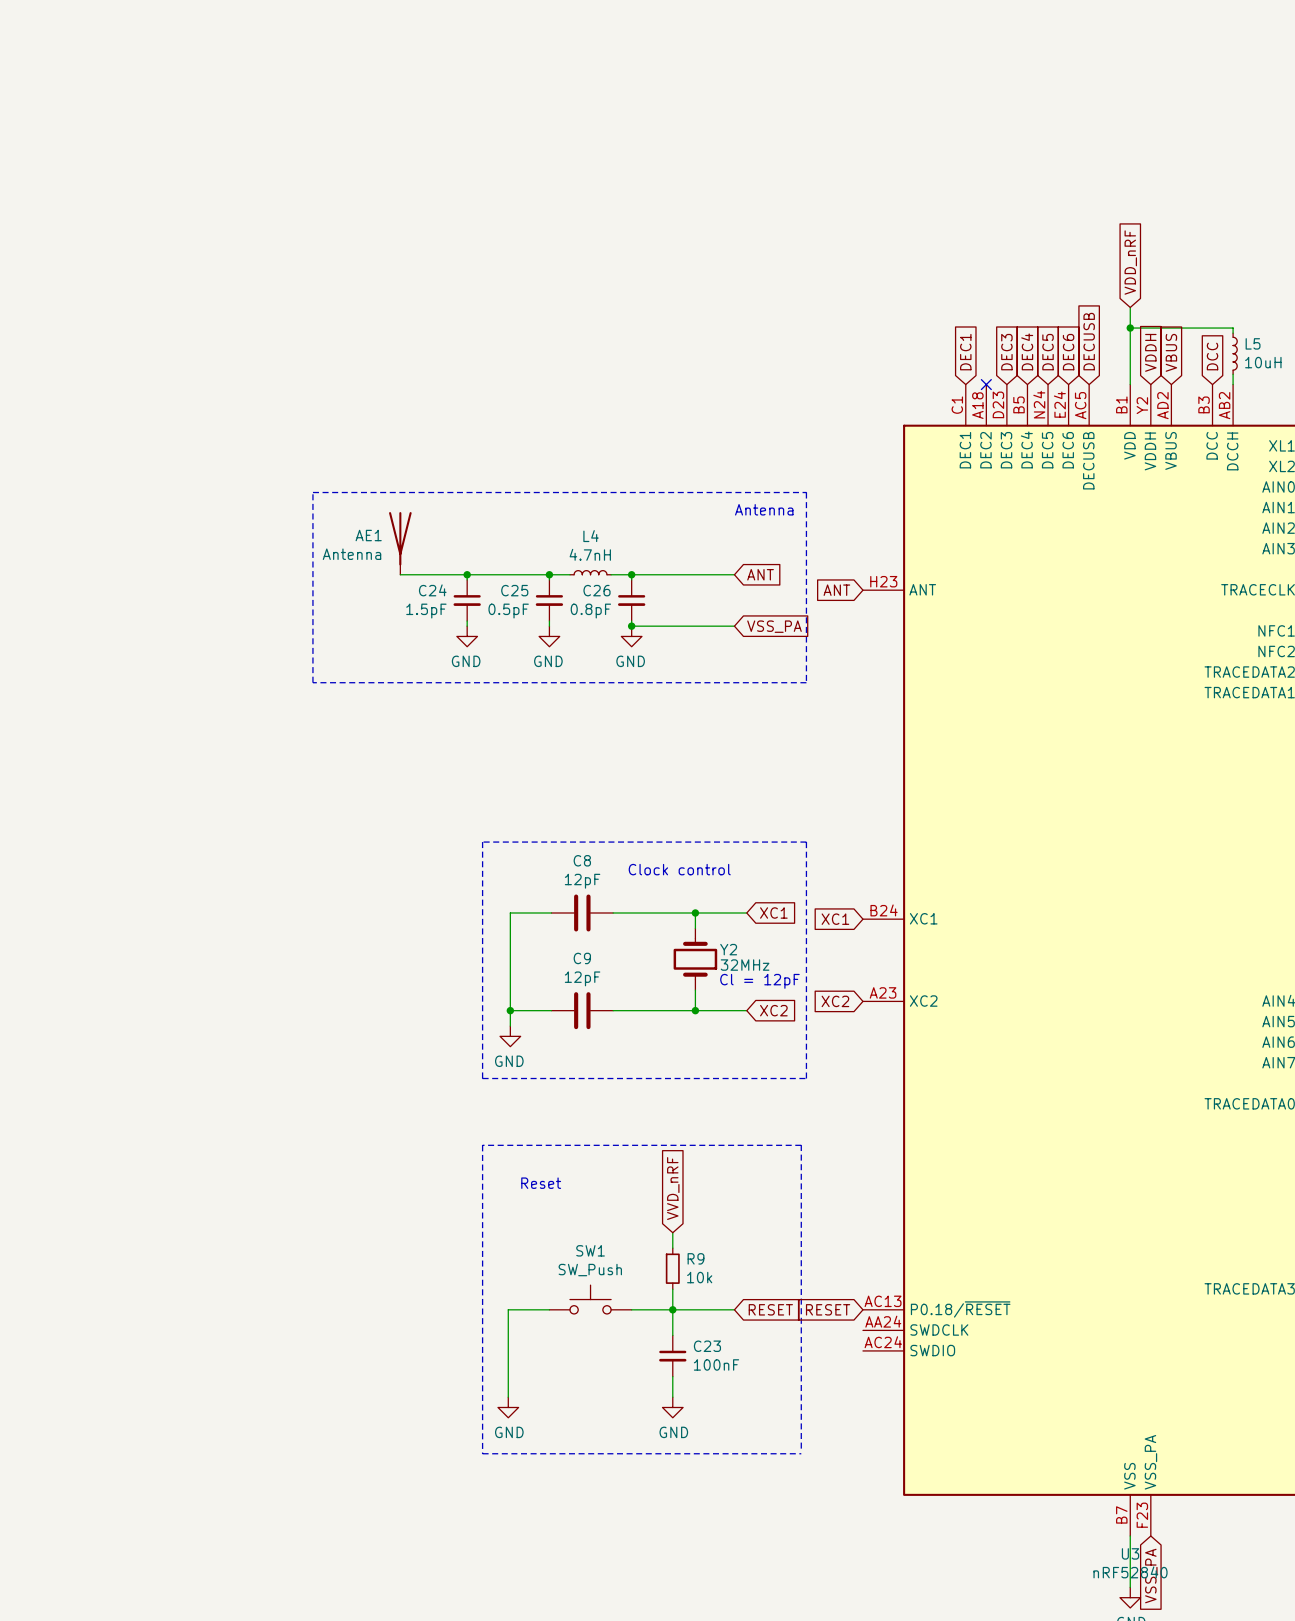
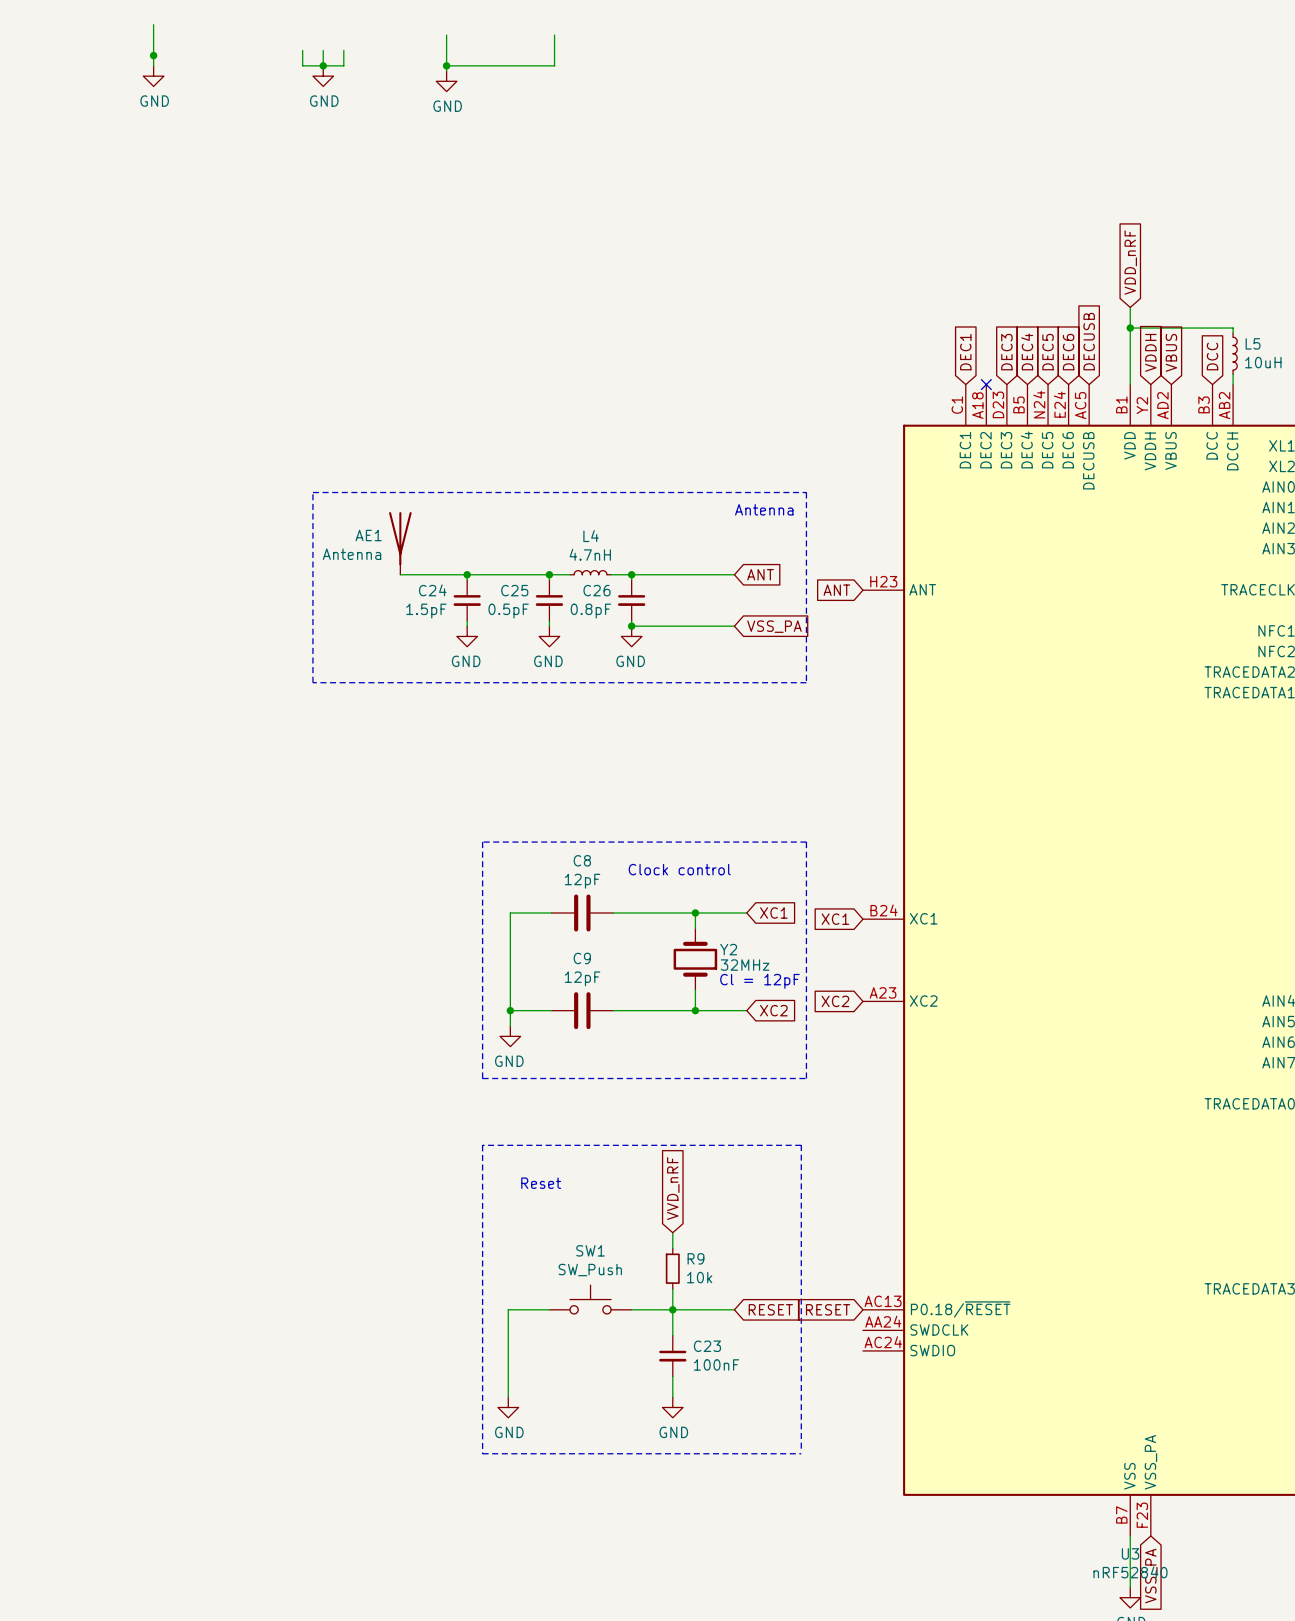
wire: none -> (153, 24) (153, 65)
wire: none -> (446, 35) (446, 71)
wire: none -> (554, 35) (554, 65) (446, 65)
wire: none -> (302, 50) (302, 65) (343, 65) (343, 50)
wire: none -> (323, 50) (323, 65)
junction: none -> (153, 55)
junction: none -> (323, 65)
junction: none -> (446, 65)
power symbol: none -> GND (153, 76)
power symbol: none -> GND (323, 76)
power symbol: none -> GND (446, 81)

